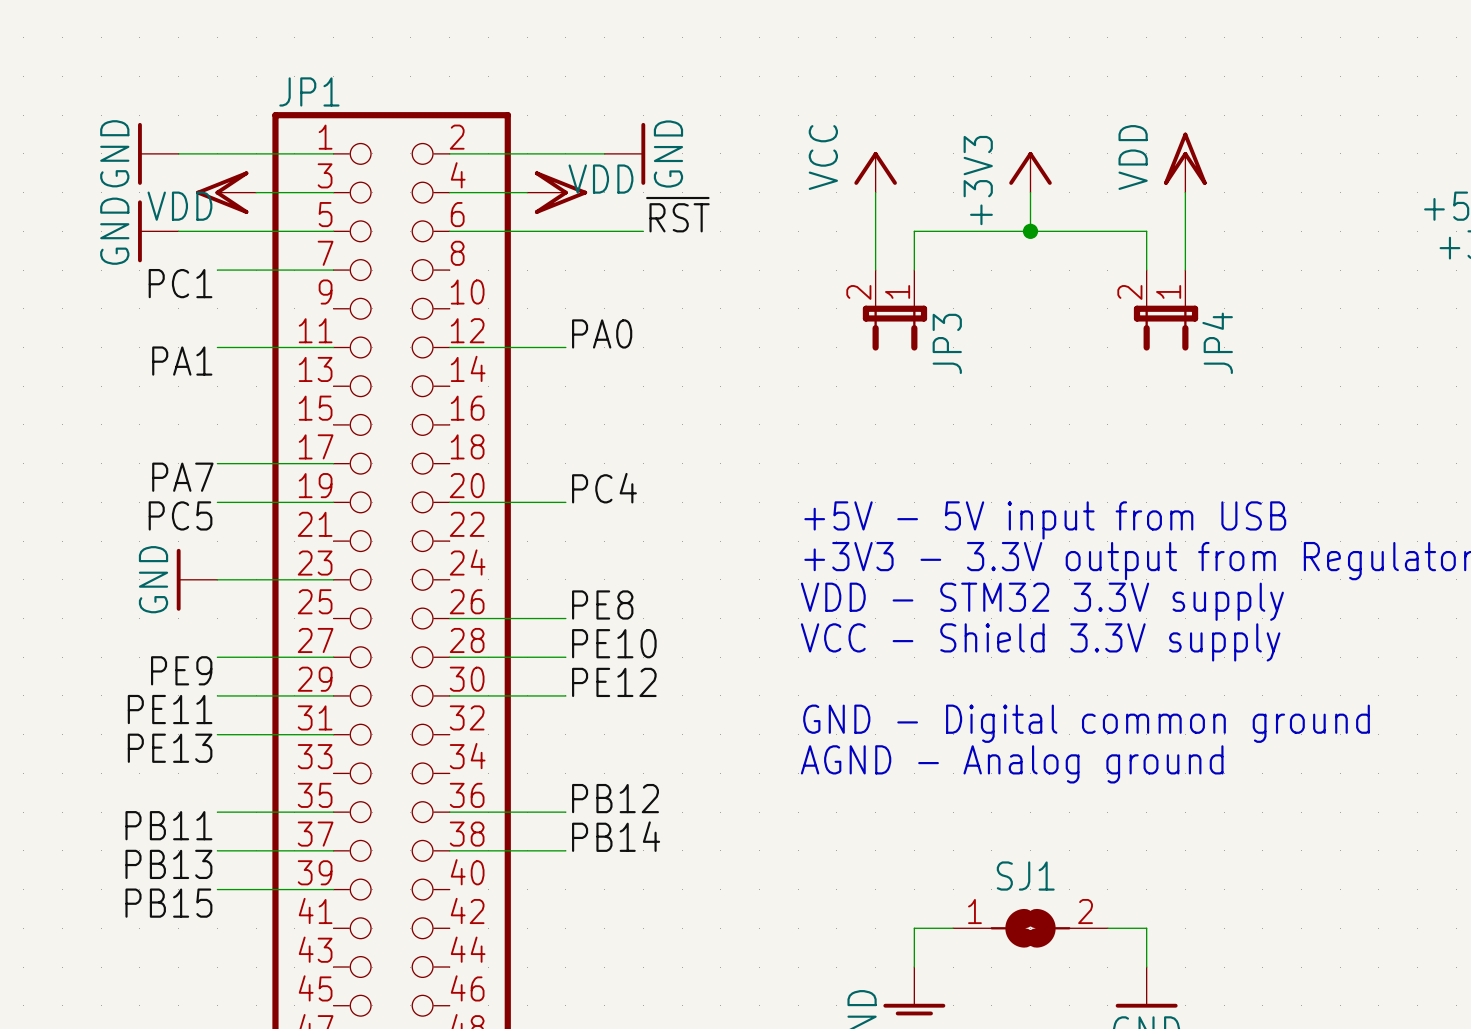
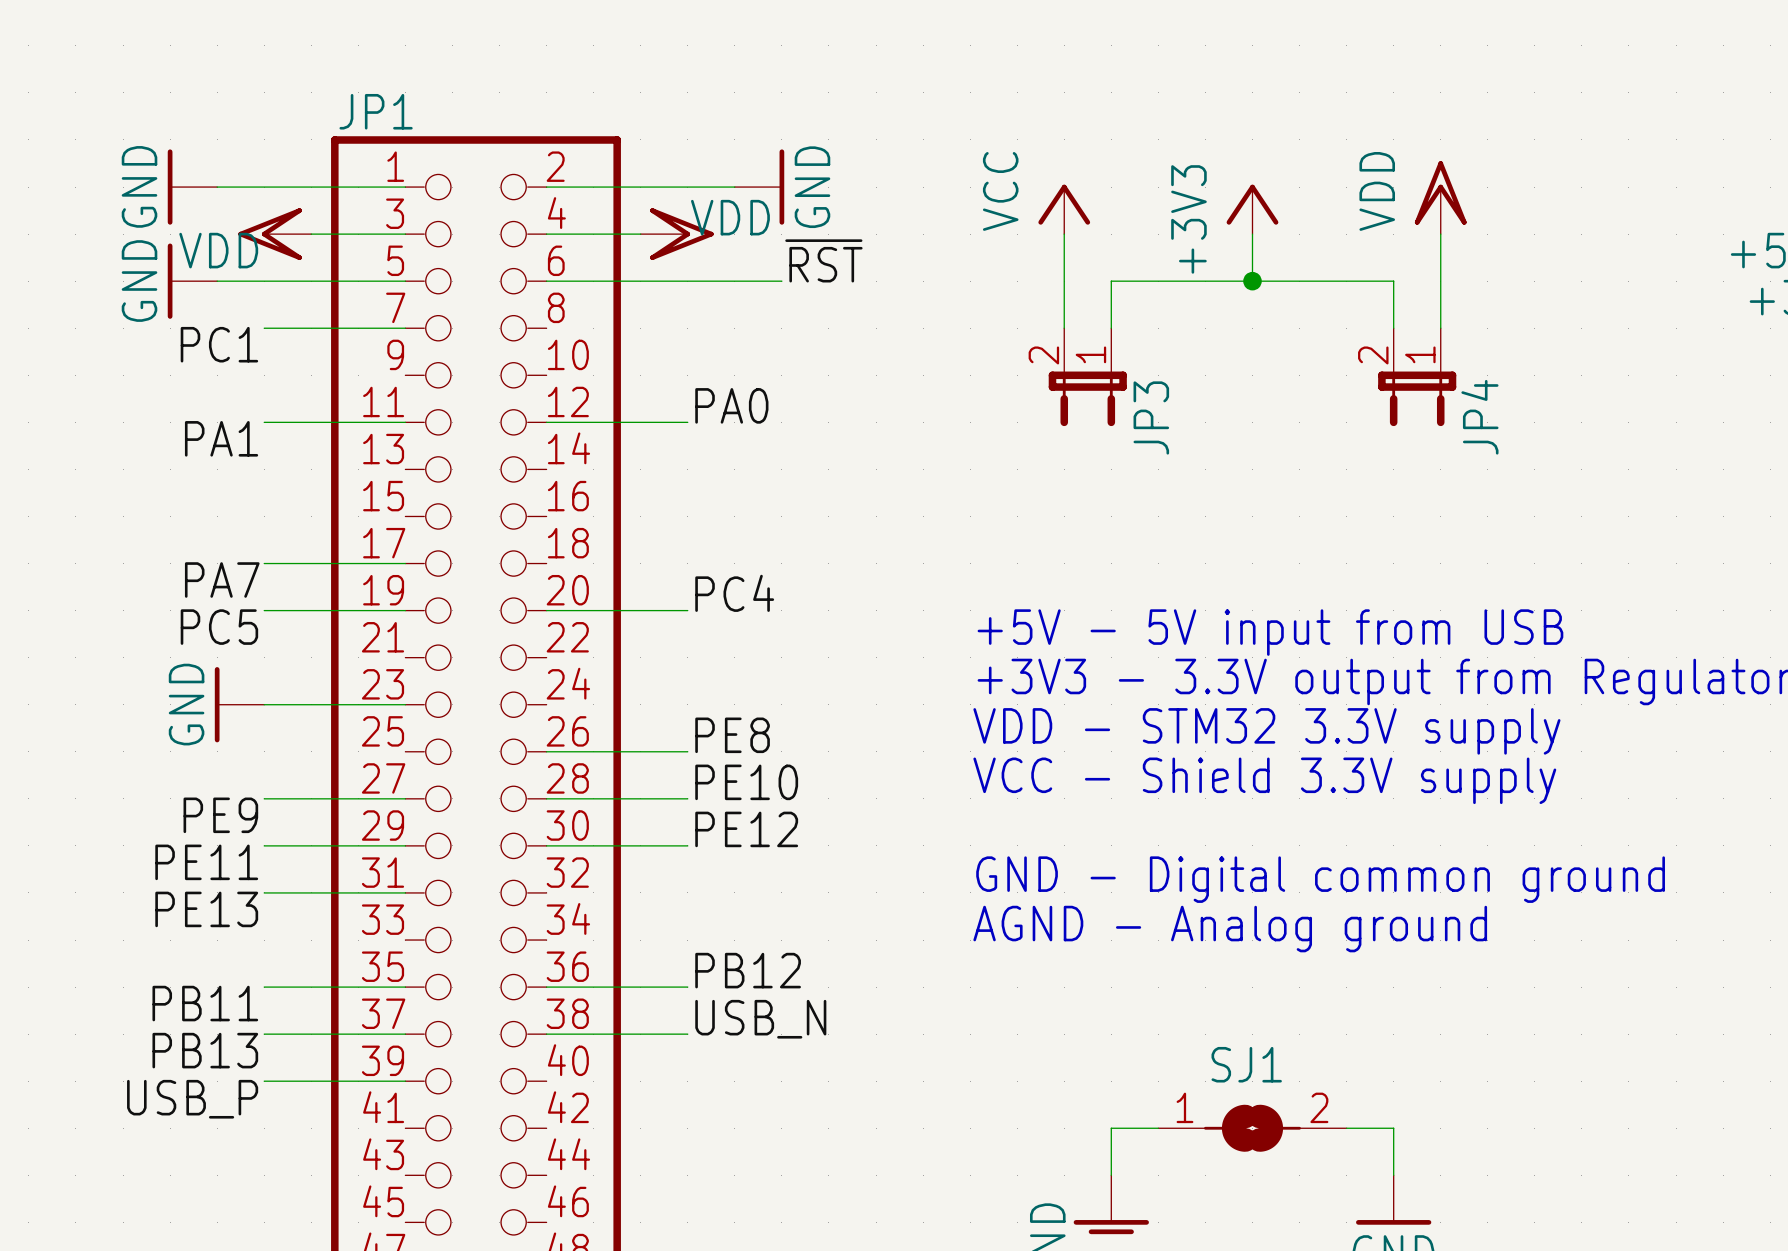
label: PB14 (616, 836) -> USB_N (760, 1019)
label: PB15 (168, 903) -> USB_P (192, 1099)

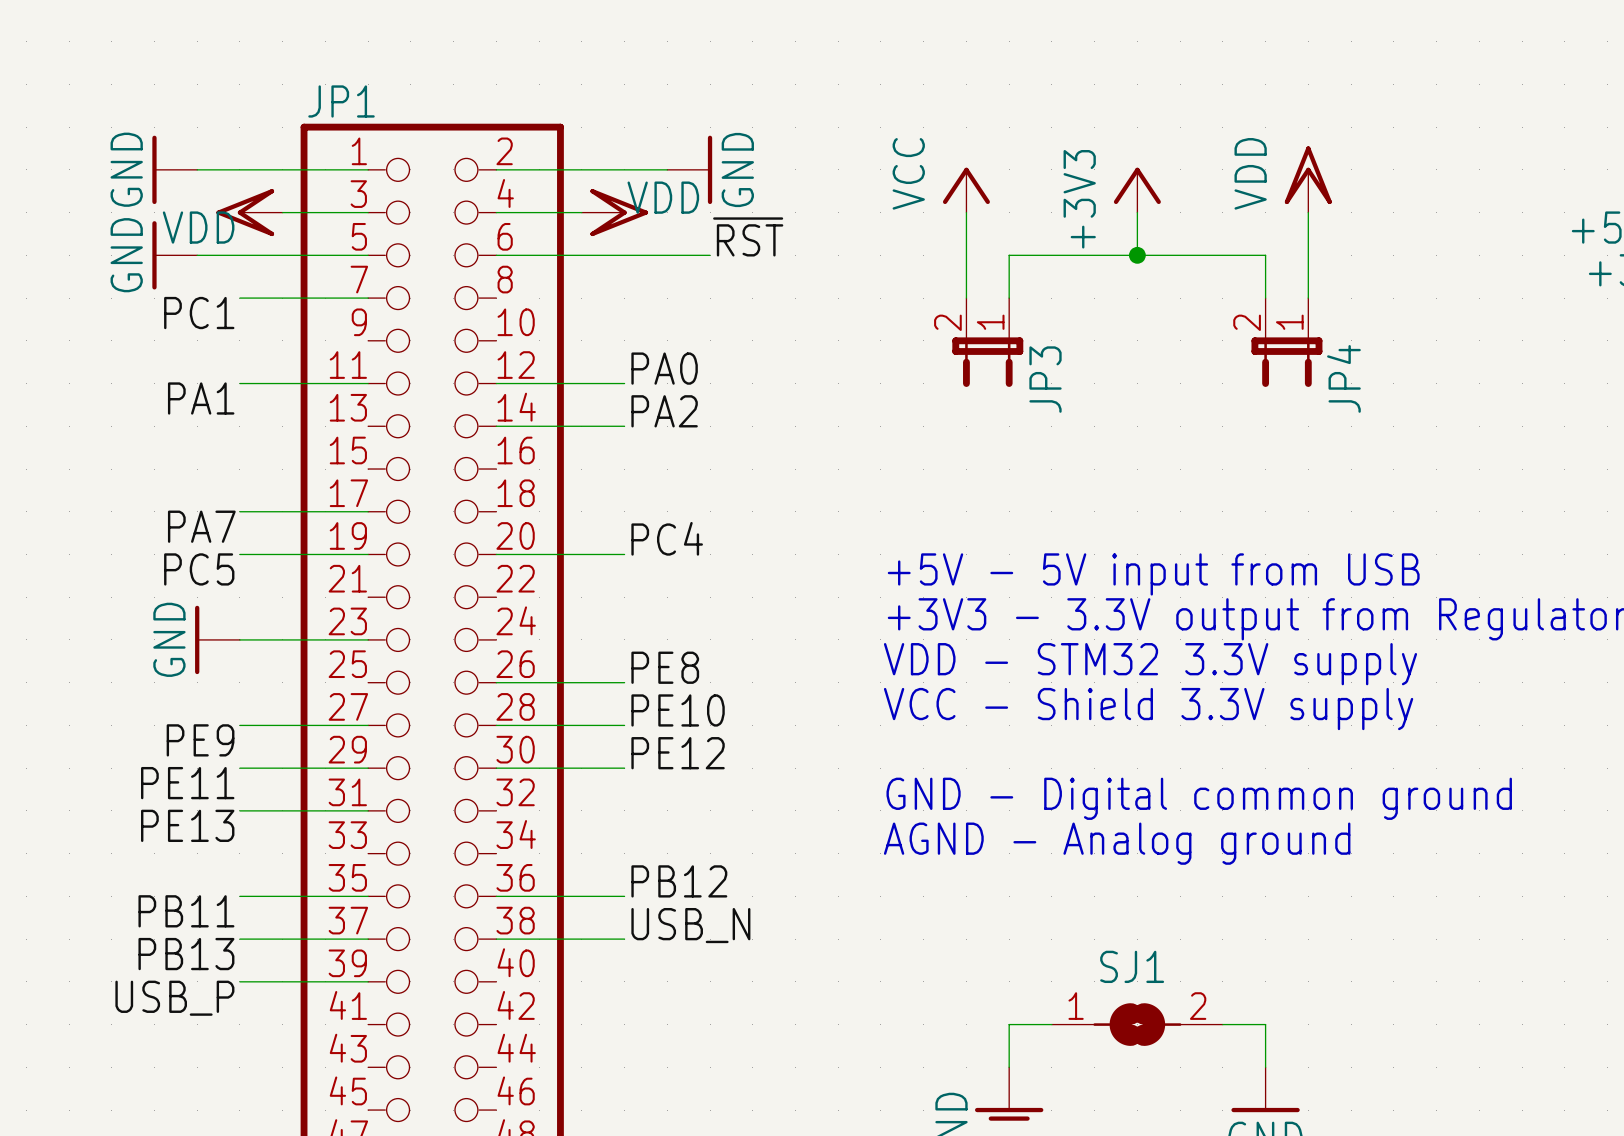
label: none -> PA2 (664, 411)
wire: none -> (496, 426) (624, 426)

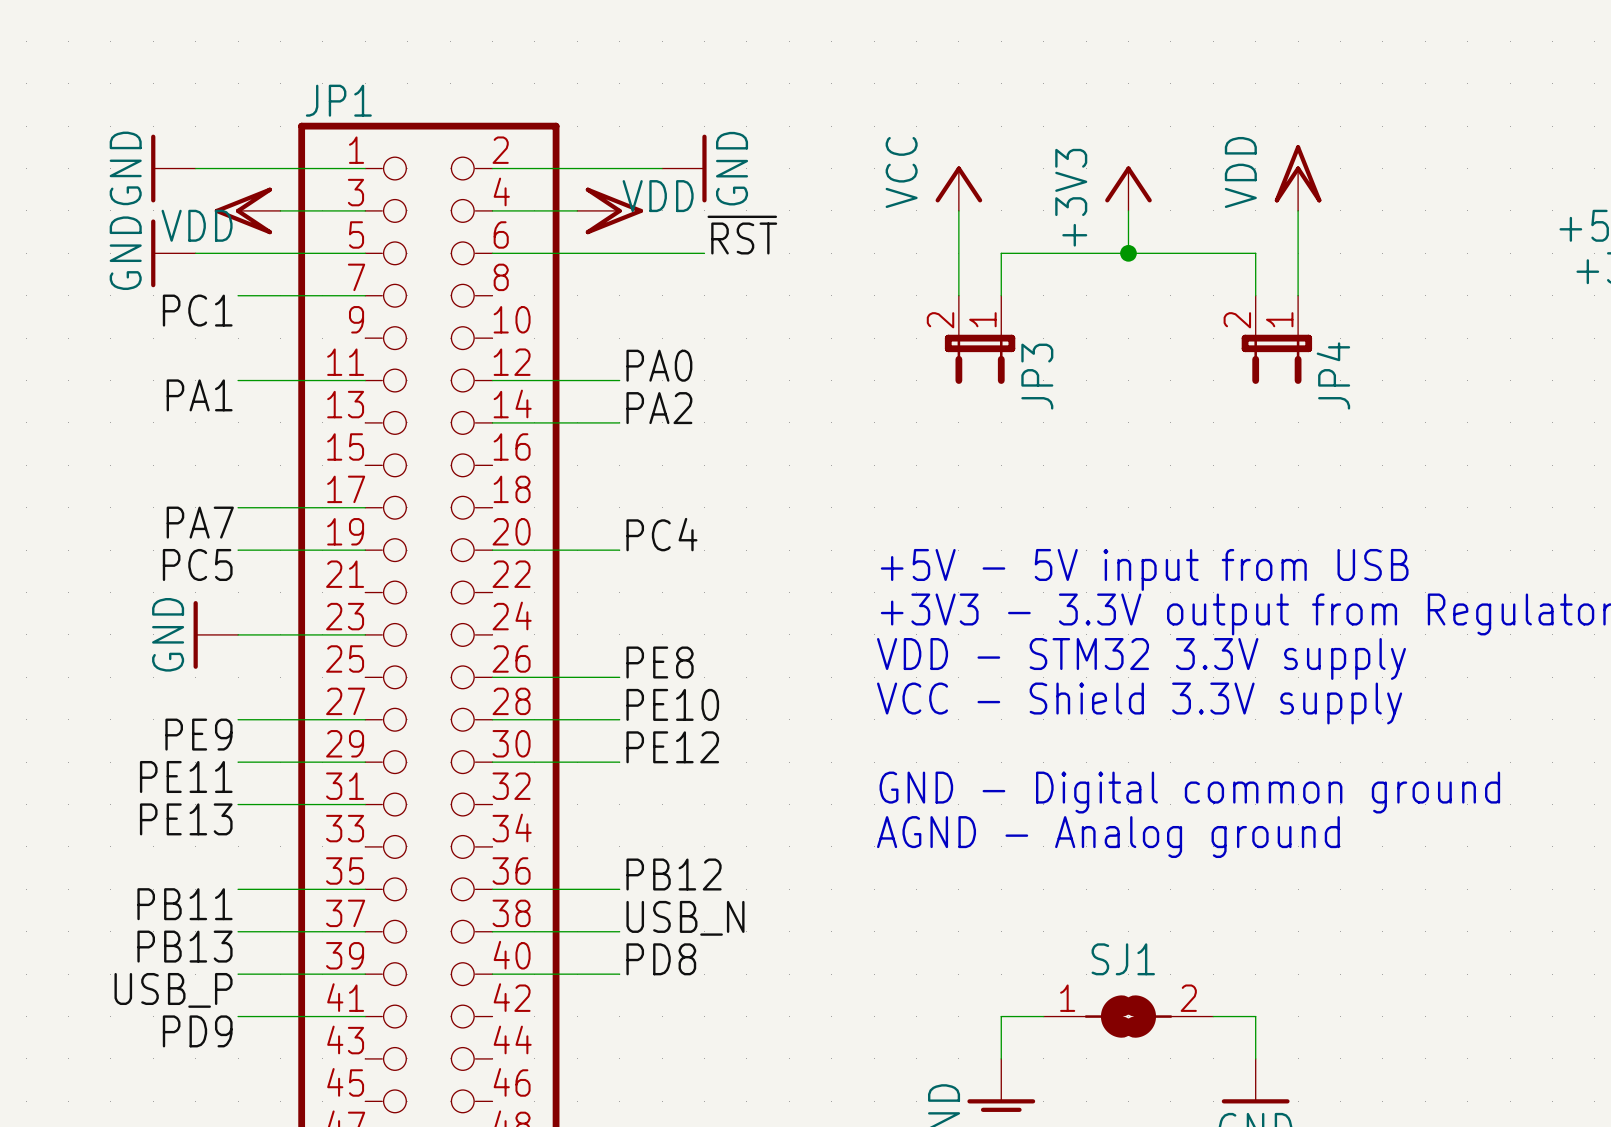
label: none -> PD8 (661, 959)
wire: none -> (492, 974) (619, 974)
wire: none -> (238, 1016) (365, 1016)
label: none -> PD9 (197, 1031)

